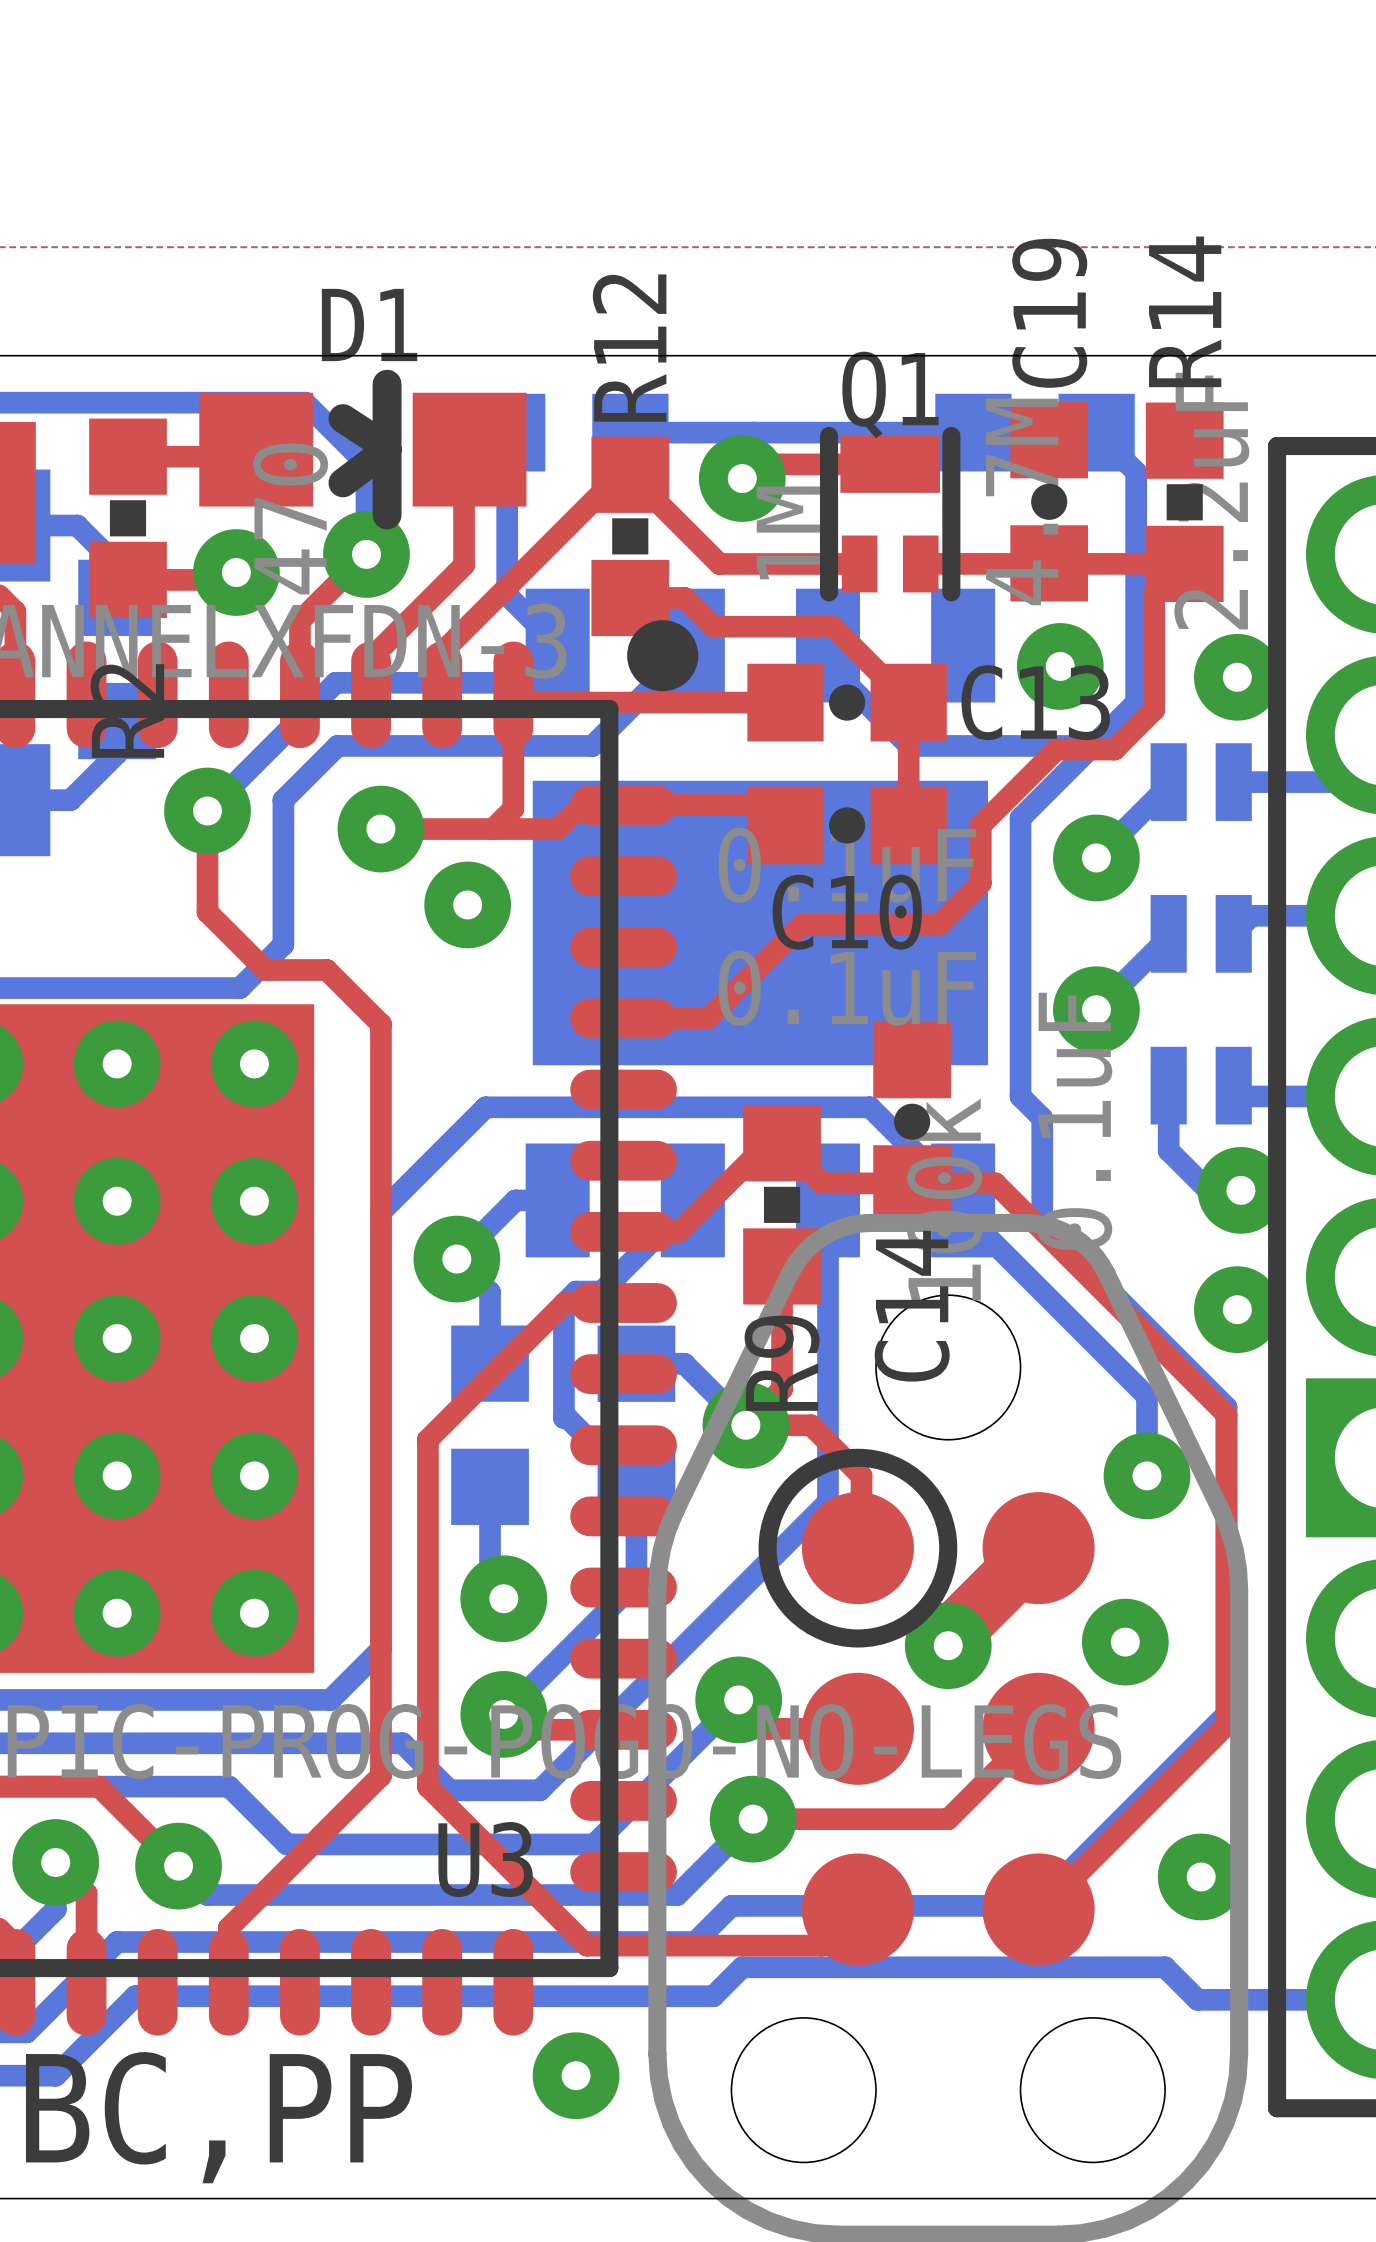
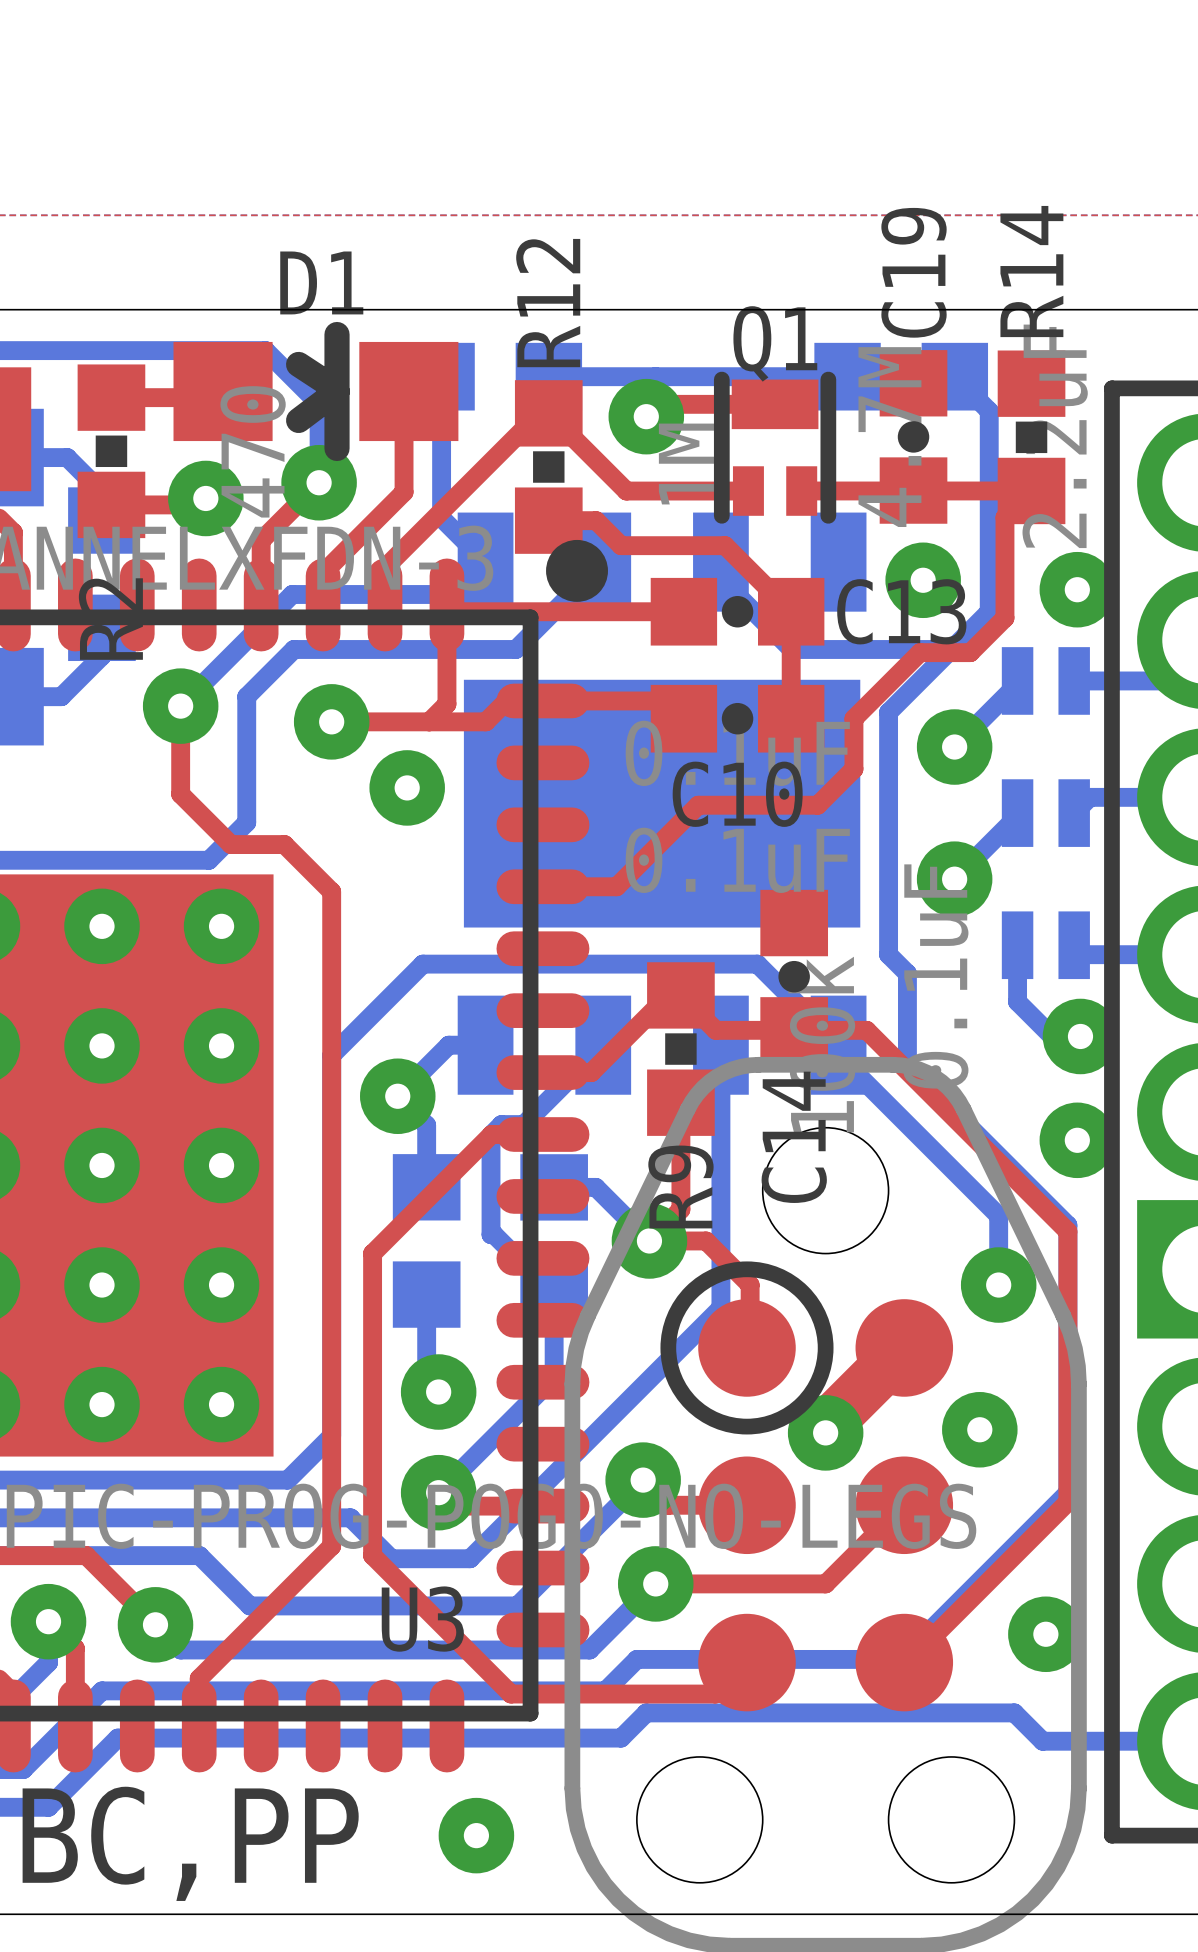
via position: (576, 2075) -> (476, 1835)

